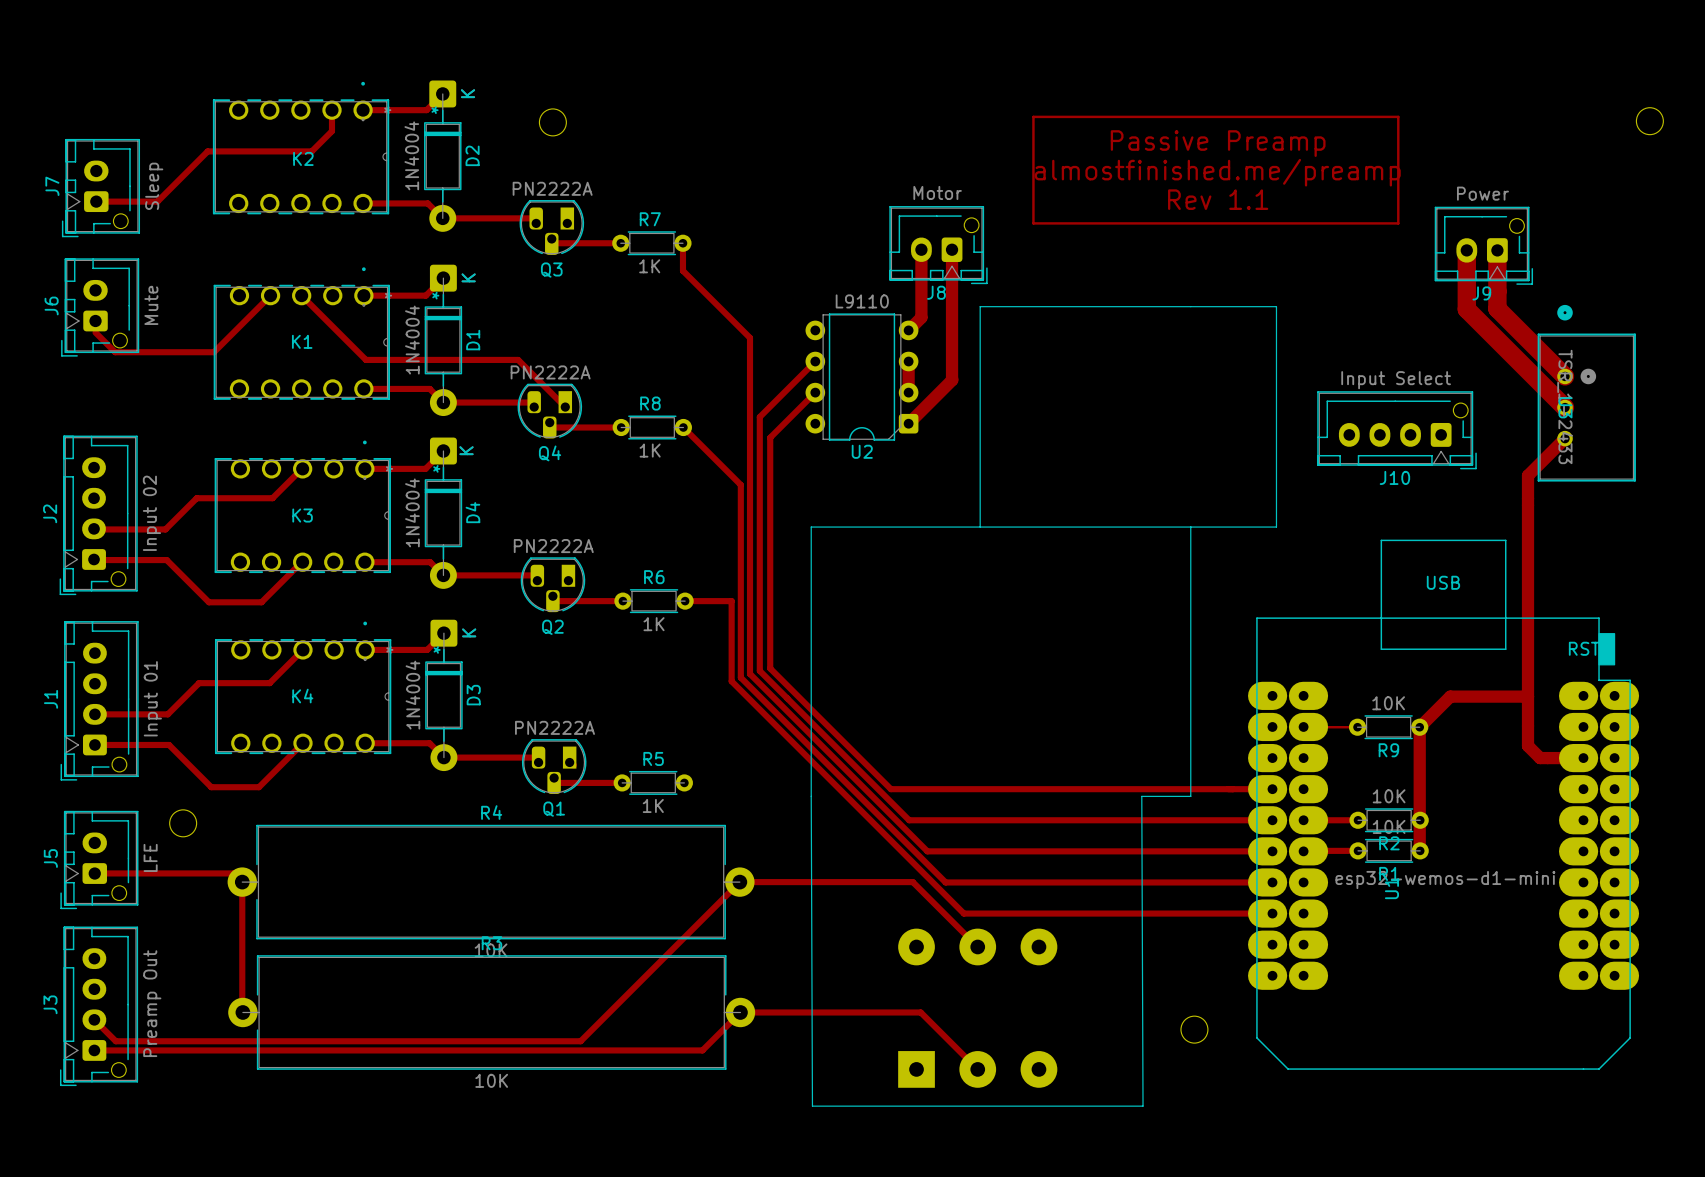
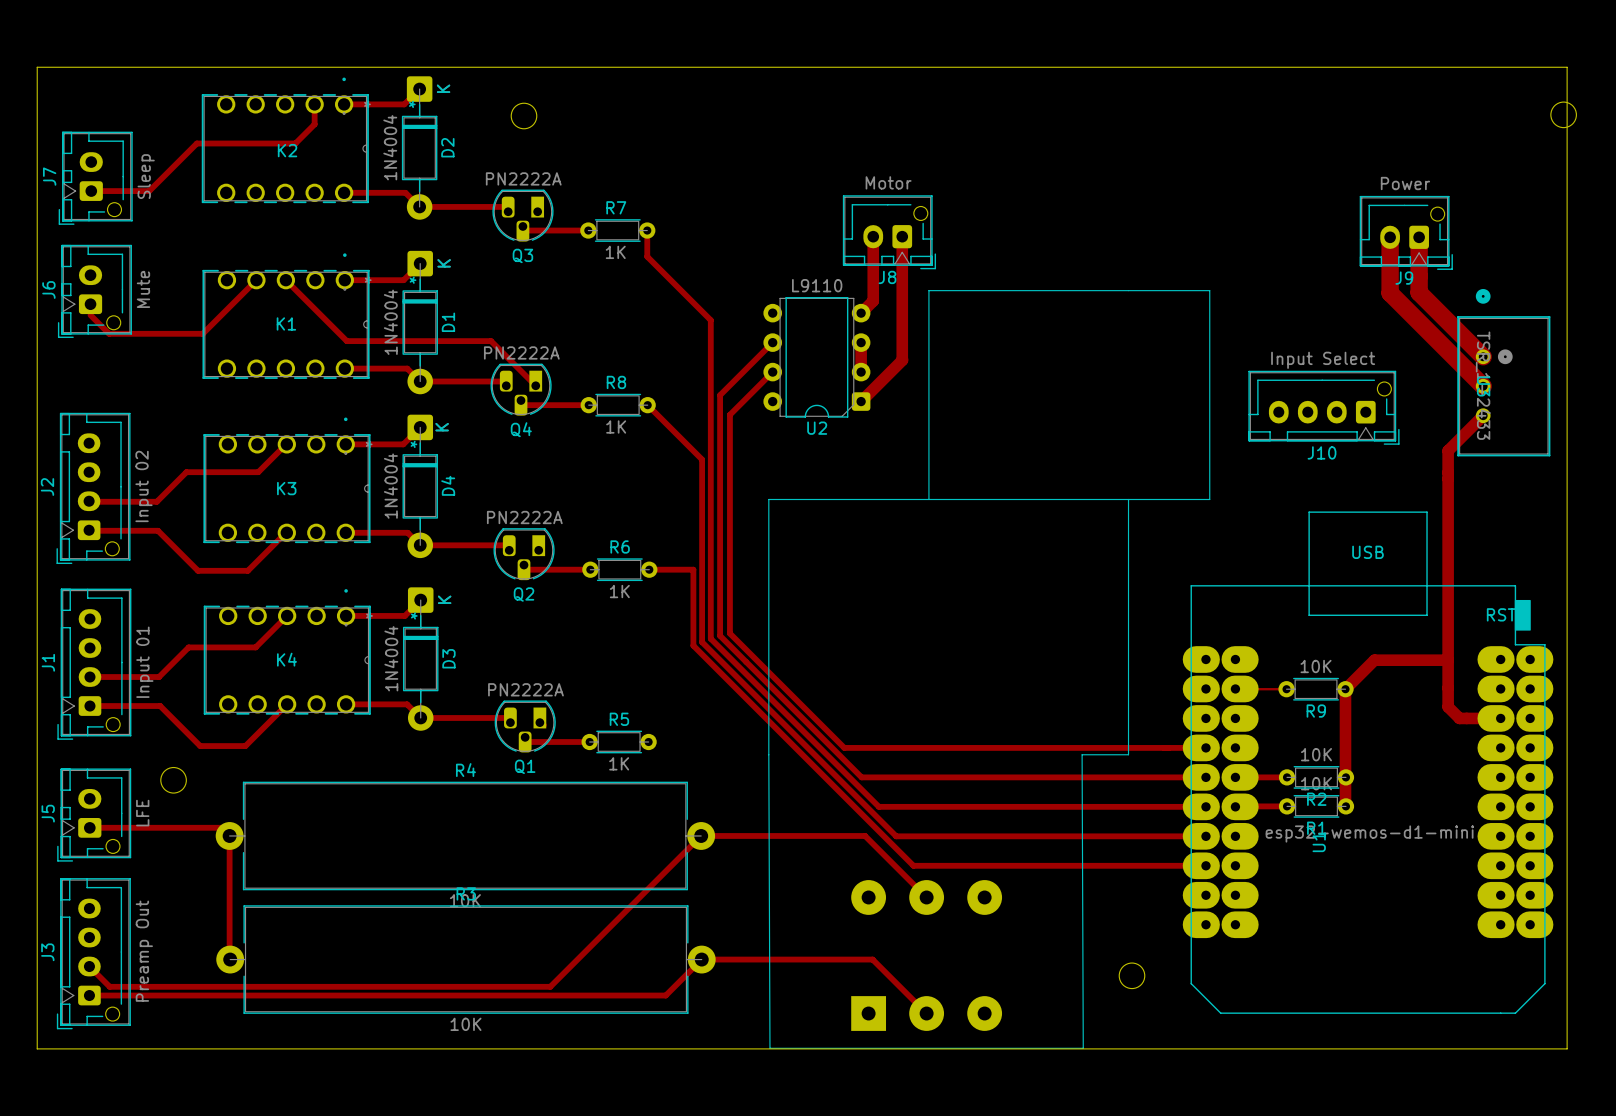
board edge: none -> (37, 67) (1567, 67) (1567, 1048) (37, 1048) (37, 67)
track: (1033, 116) (1398, 116) (1398, 223) (1033, 223) (1033, 116) -> none
text: Passive Preamp (1218, 143) -> none
text: almostfinished.me/preamp (1217, 172) -> none
text: Rev 1.1 (1218, 199) -> none

